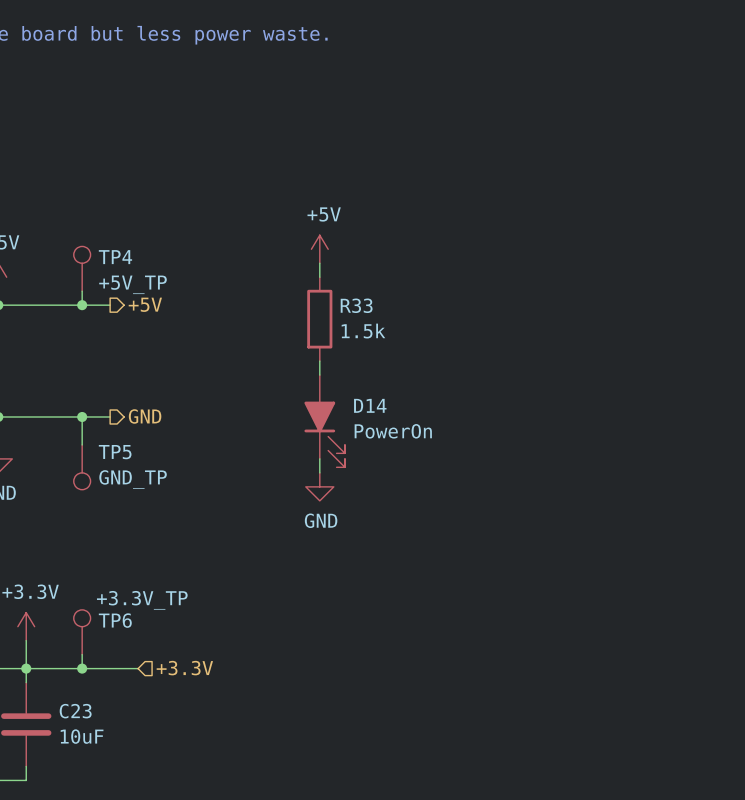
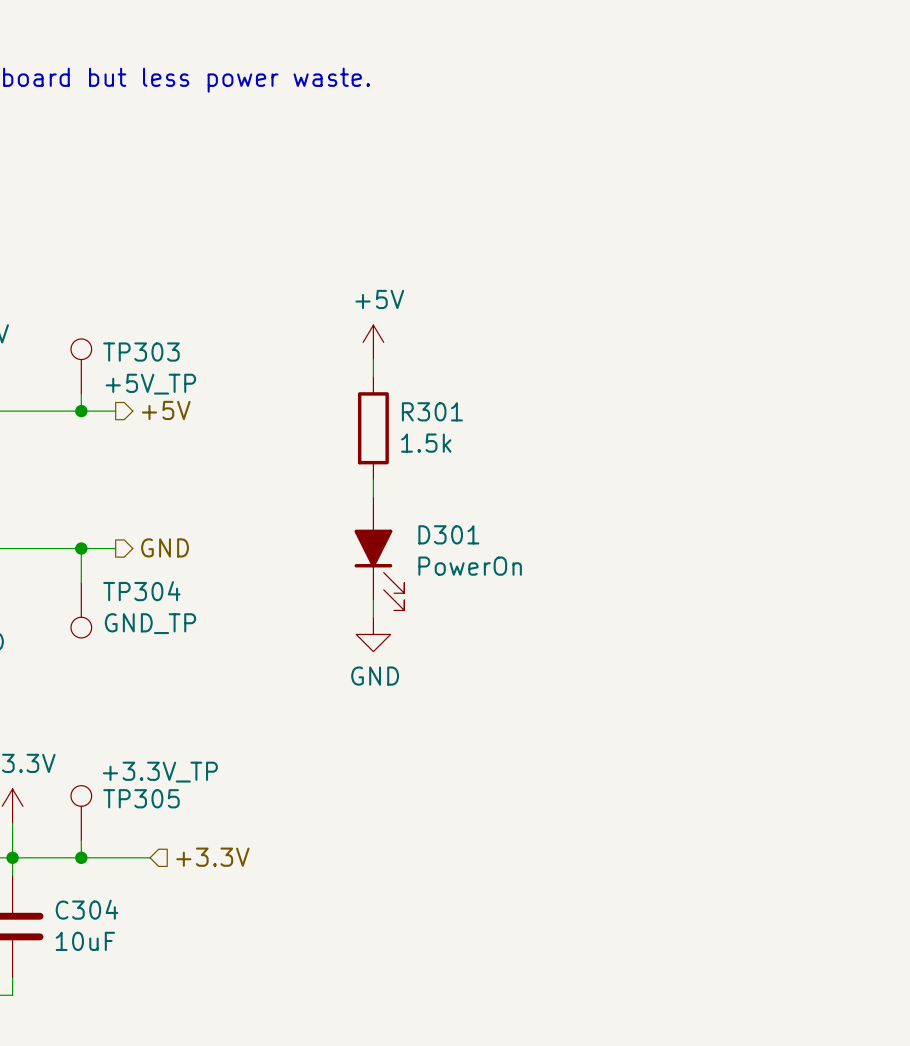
TP4 name: TP4 (115, 257) -> TP303 (141, 352)
R33 name: R33 (356, 305) -> R301 (432, 411)
D14 name: D14 (370, 405) -> D301 (448, 534)
TP5 name: TP5 (115, 452) -> TP304 (141, 591)
TP6 name: TP6 (115, 620) -> TP305 (141, 798)
C23 name: C23 (75, 711) -> C304 (87, 909)

